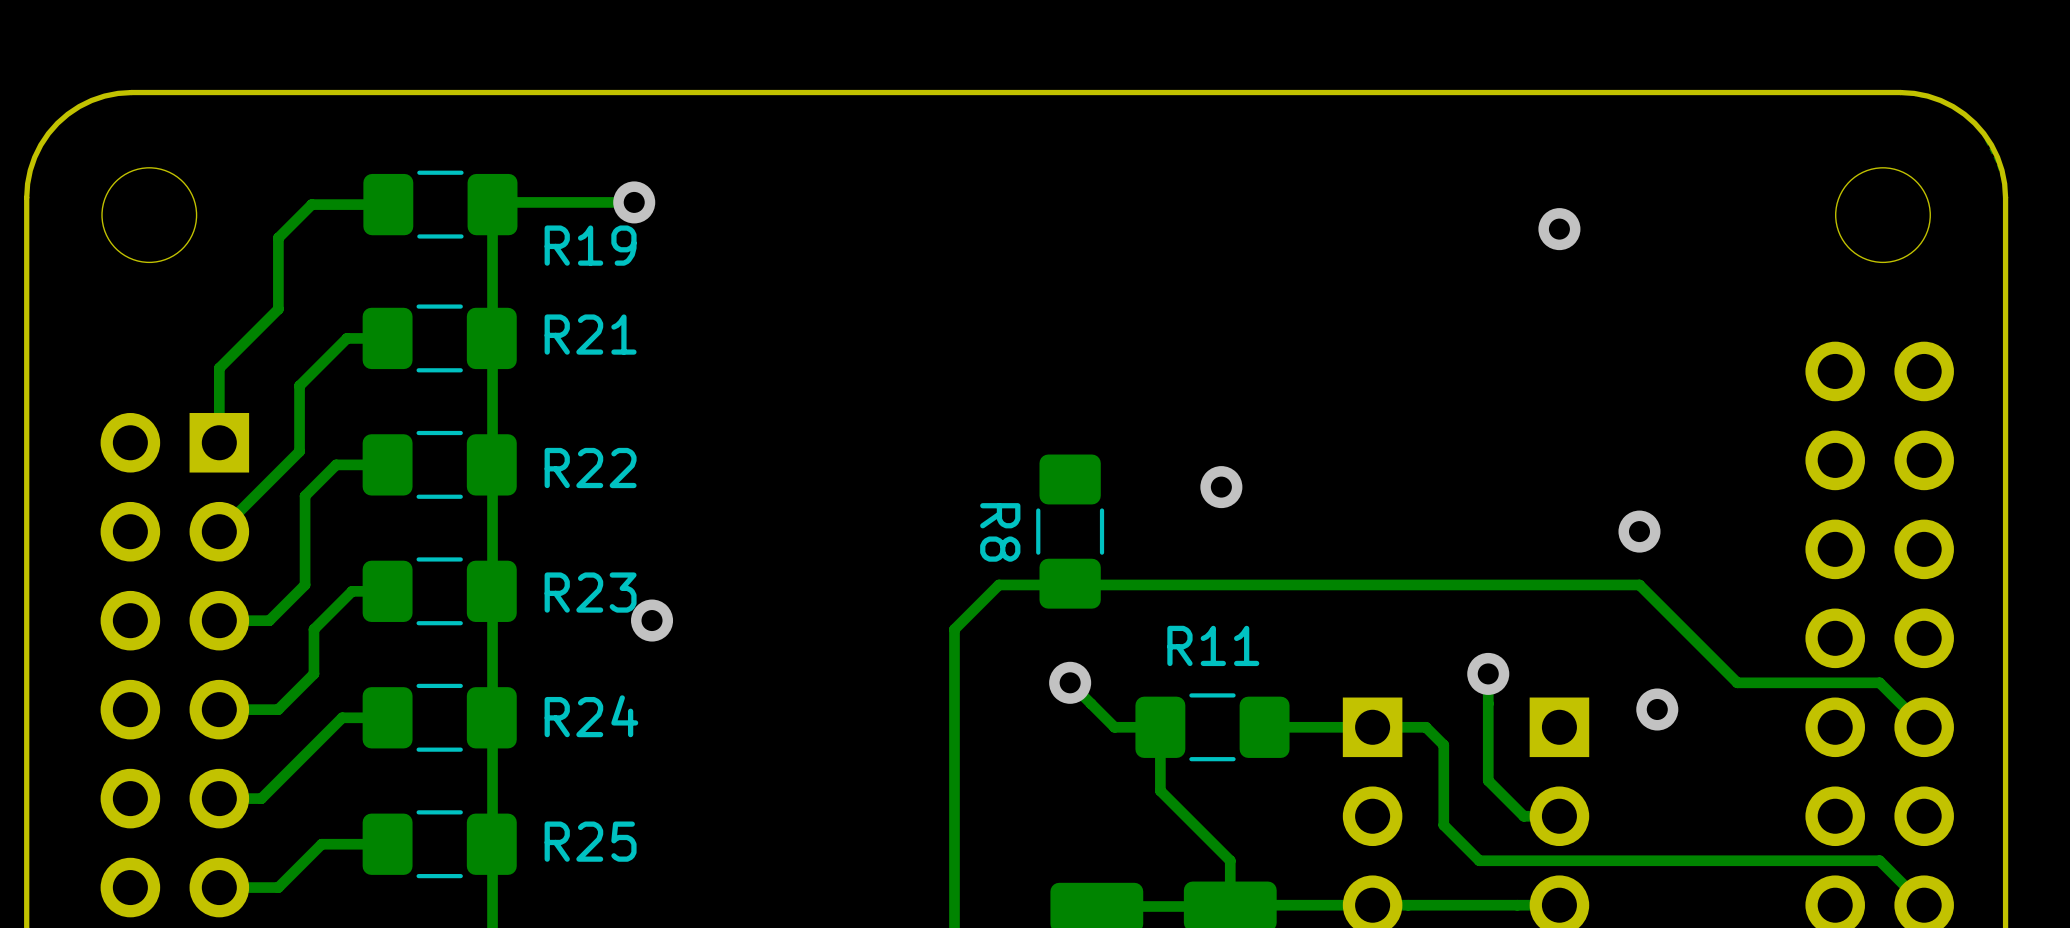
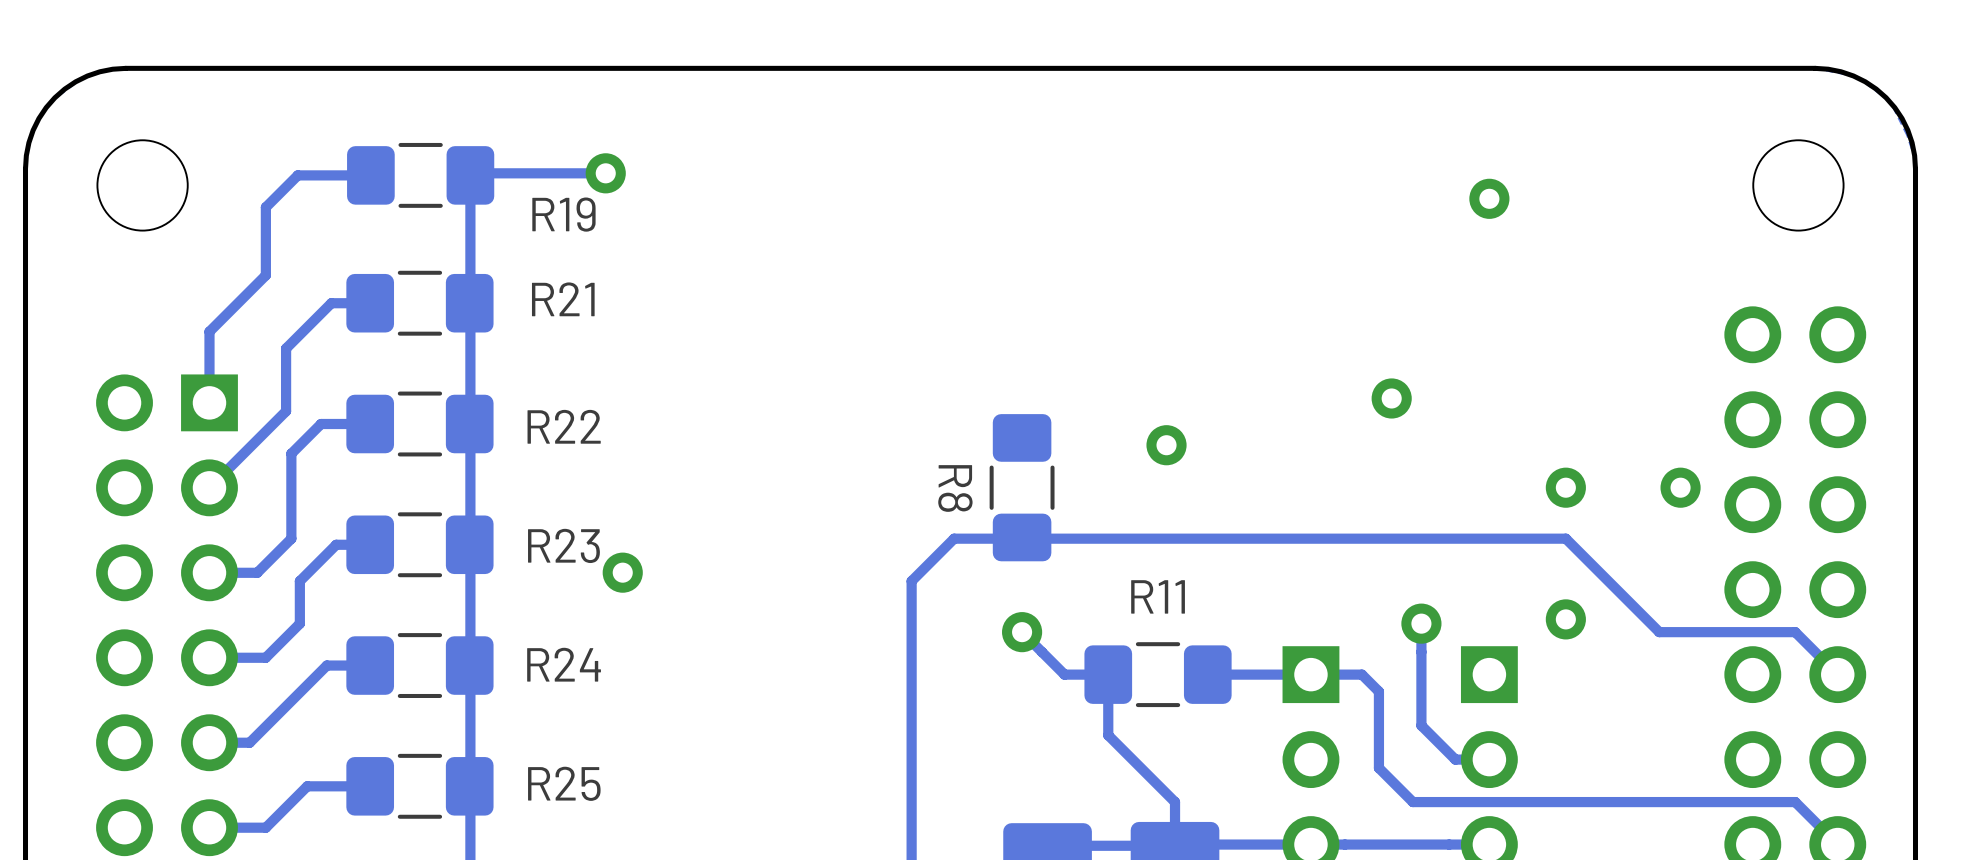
via: none -> (1391, 398)
via: none -> (1680, 487)
via position: (1657, 709) -> (1565, 619)

